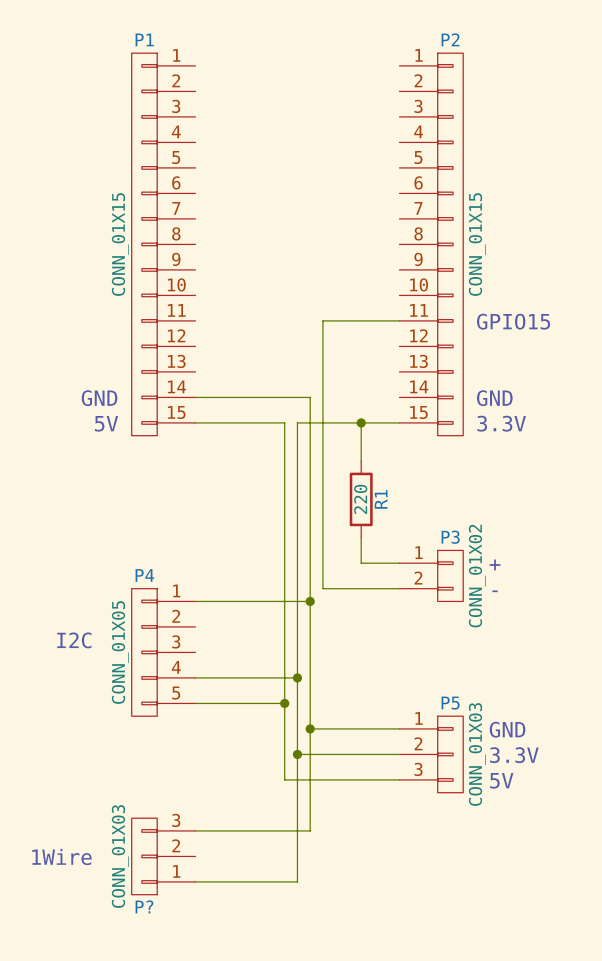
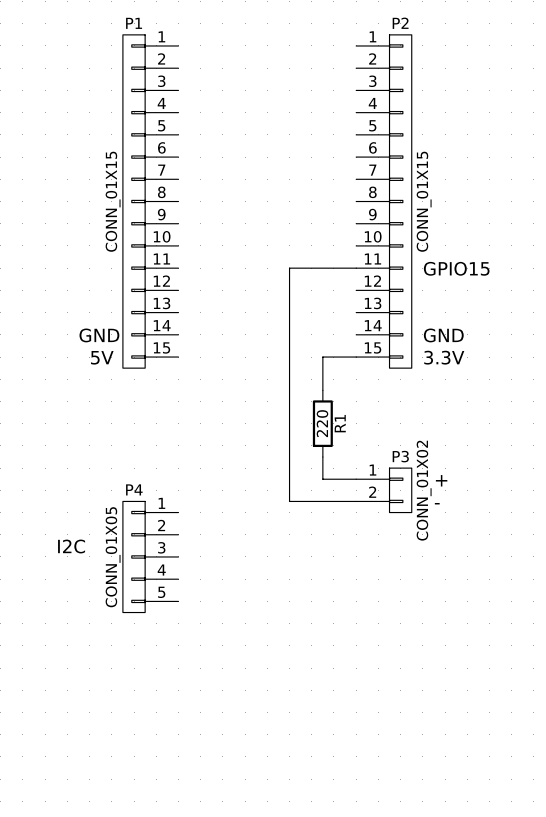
wire: (195, 397) (310, 397) (310, 830) (195, 830) -> none
wire: (195, 422) (284, 422) (284, 779) (399, 779) -> none
wire: (361, 422) (297, 422) (297, 881) (195, 881) -> none
junction: (361, 422) -> none
wire: (195, 601) (310, 601) -> none
junction: (310, 601) -> none
wire: (195, 677) (297, 677) -> none
junction: (297, 677) -> none
wire: (195, 703) (284, 703) -> none
junction: (284, 703) -> none
wire: (310, 728) (399, 728) -> none
junction: (310, 728) -> none
text: GND (507, 729) -> none
wire: (297, 754) (399, 754) -> none
junction: (297, 754) -> none
P5: CONN_01X03 (431, 754) -> none
text: 3.3V (514, 755) -> none
text: 5V (501, 780) -> none
text: 1Wire (61, 856) -> none
P?: CONN_01X03 (163, 856) -> none

